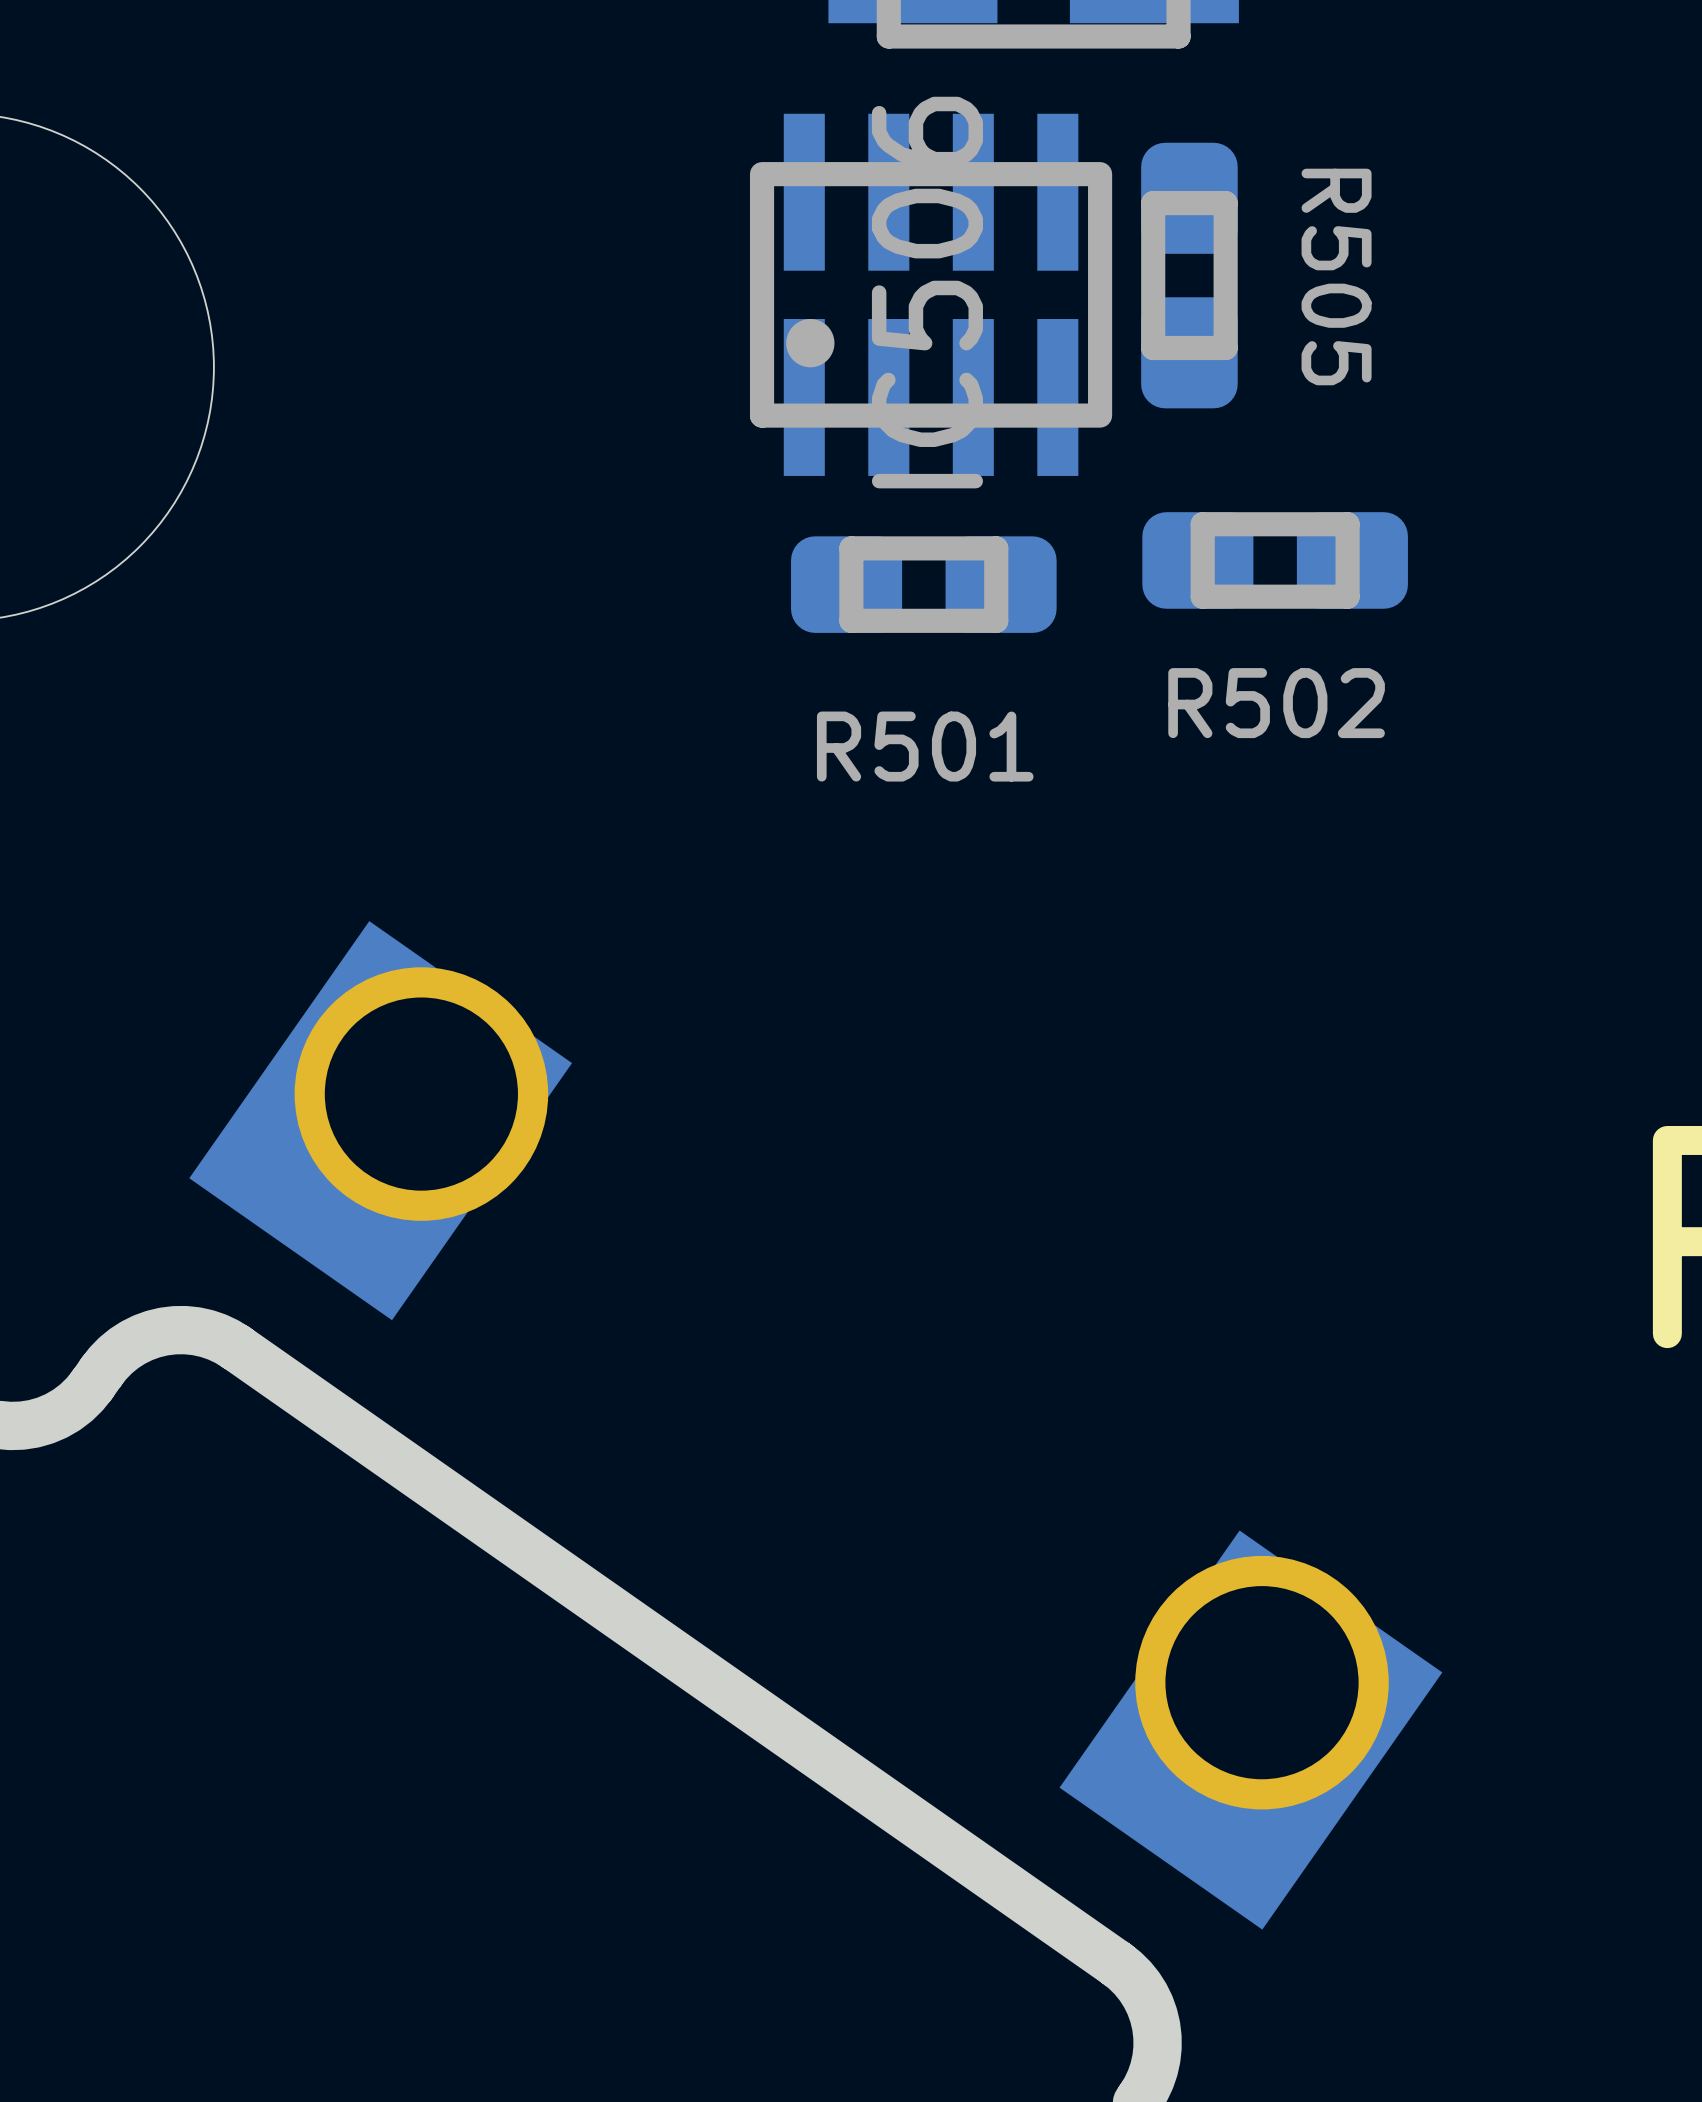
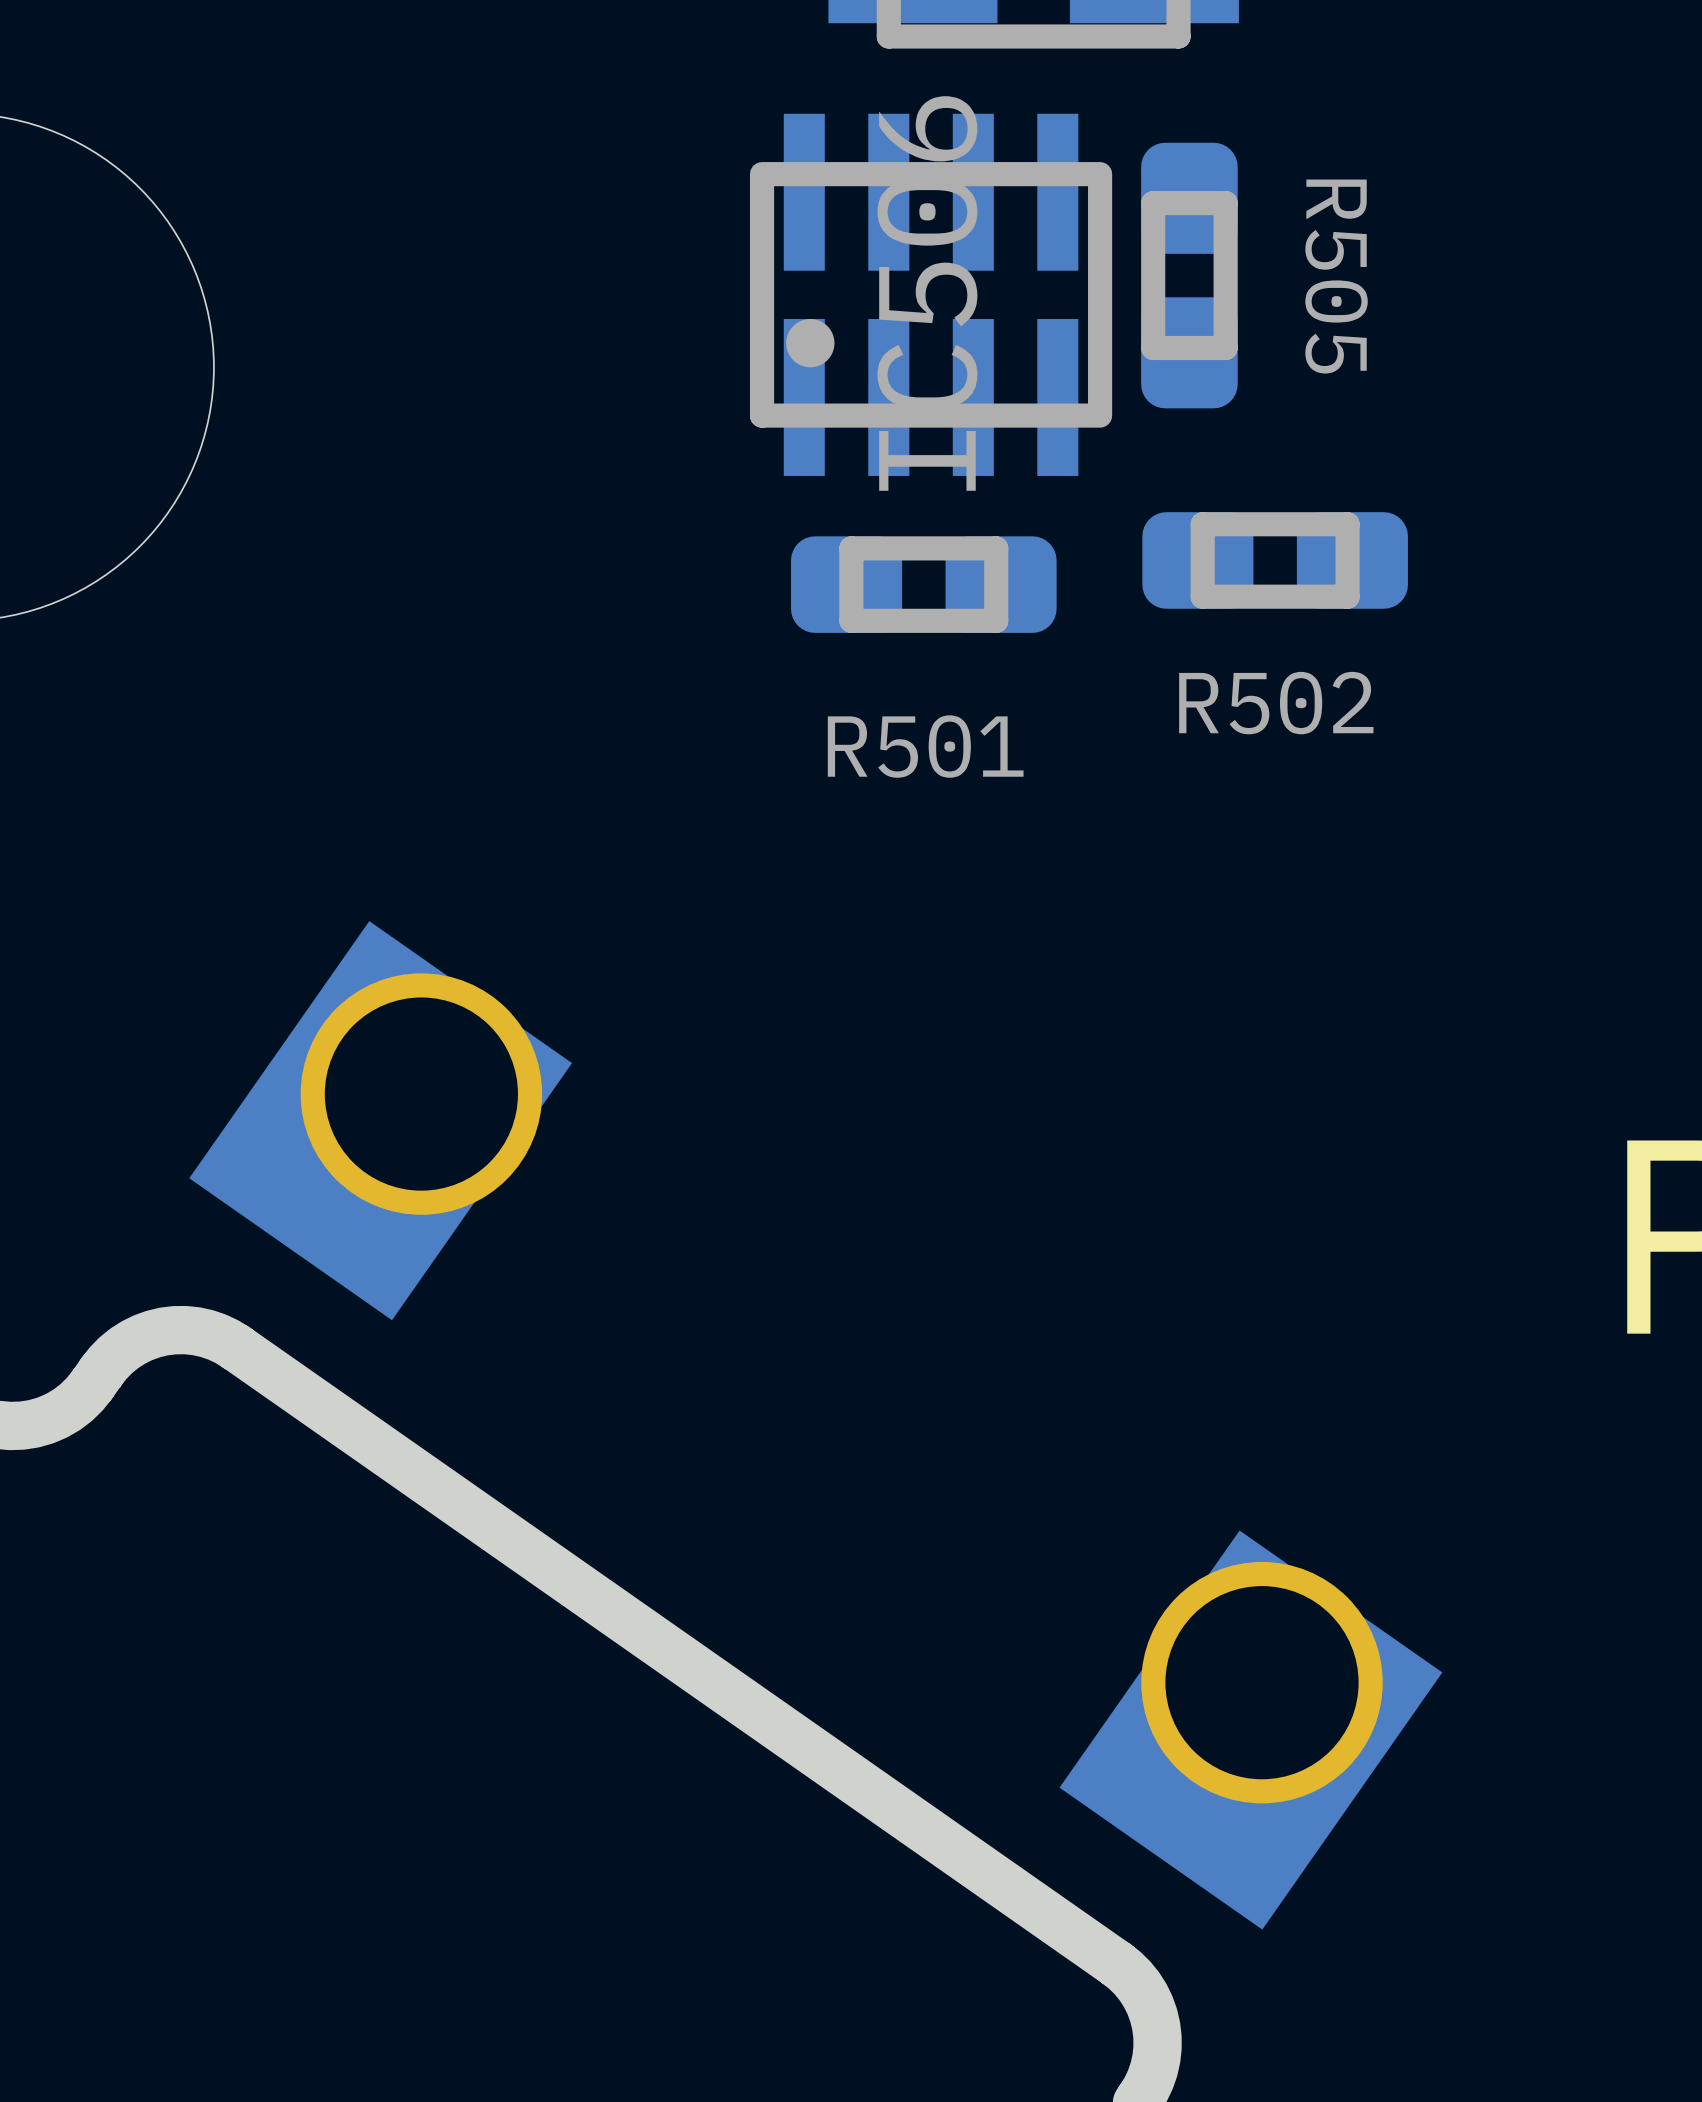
part footprint: [189, 921, 1443, 1930] -> [189, 921, 1443, 1930]

